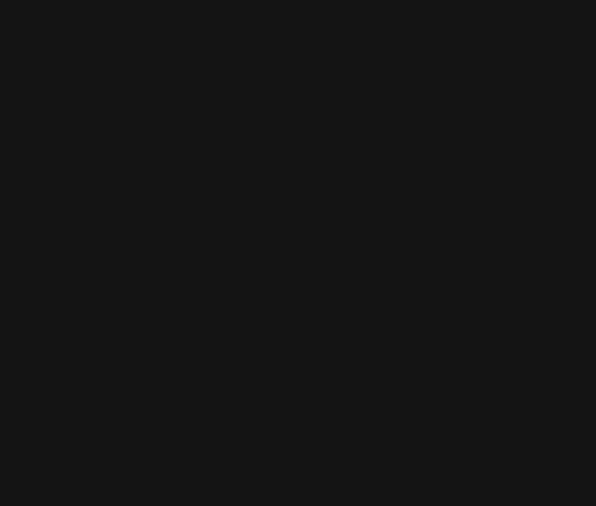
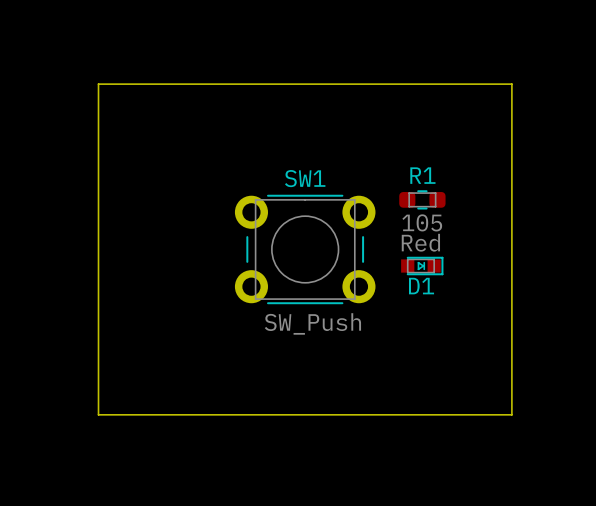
board edge: none -> (98, 84) (511, 84) (511, 414) (98, 414) (98, 84)
R1: none -> 105 (422, 199)
SW1: none -> SW_Push (305, 249)
D1: none -> Red (422, 266)

